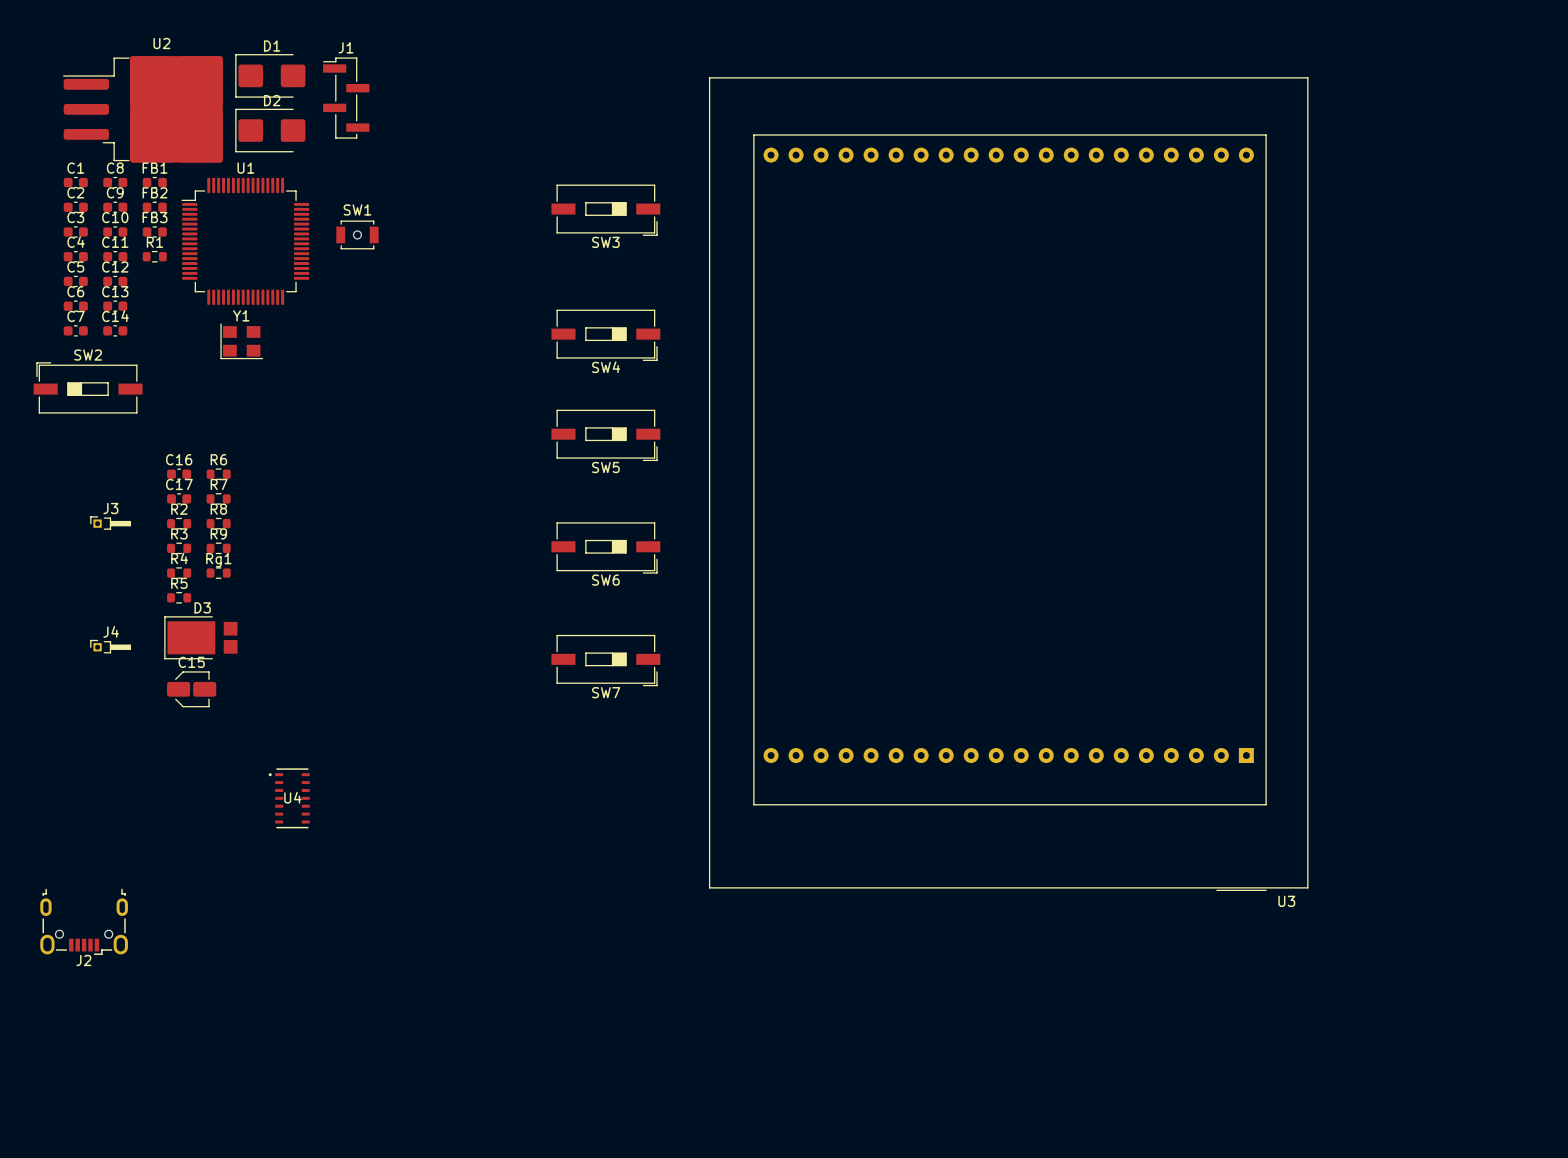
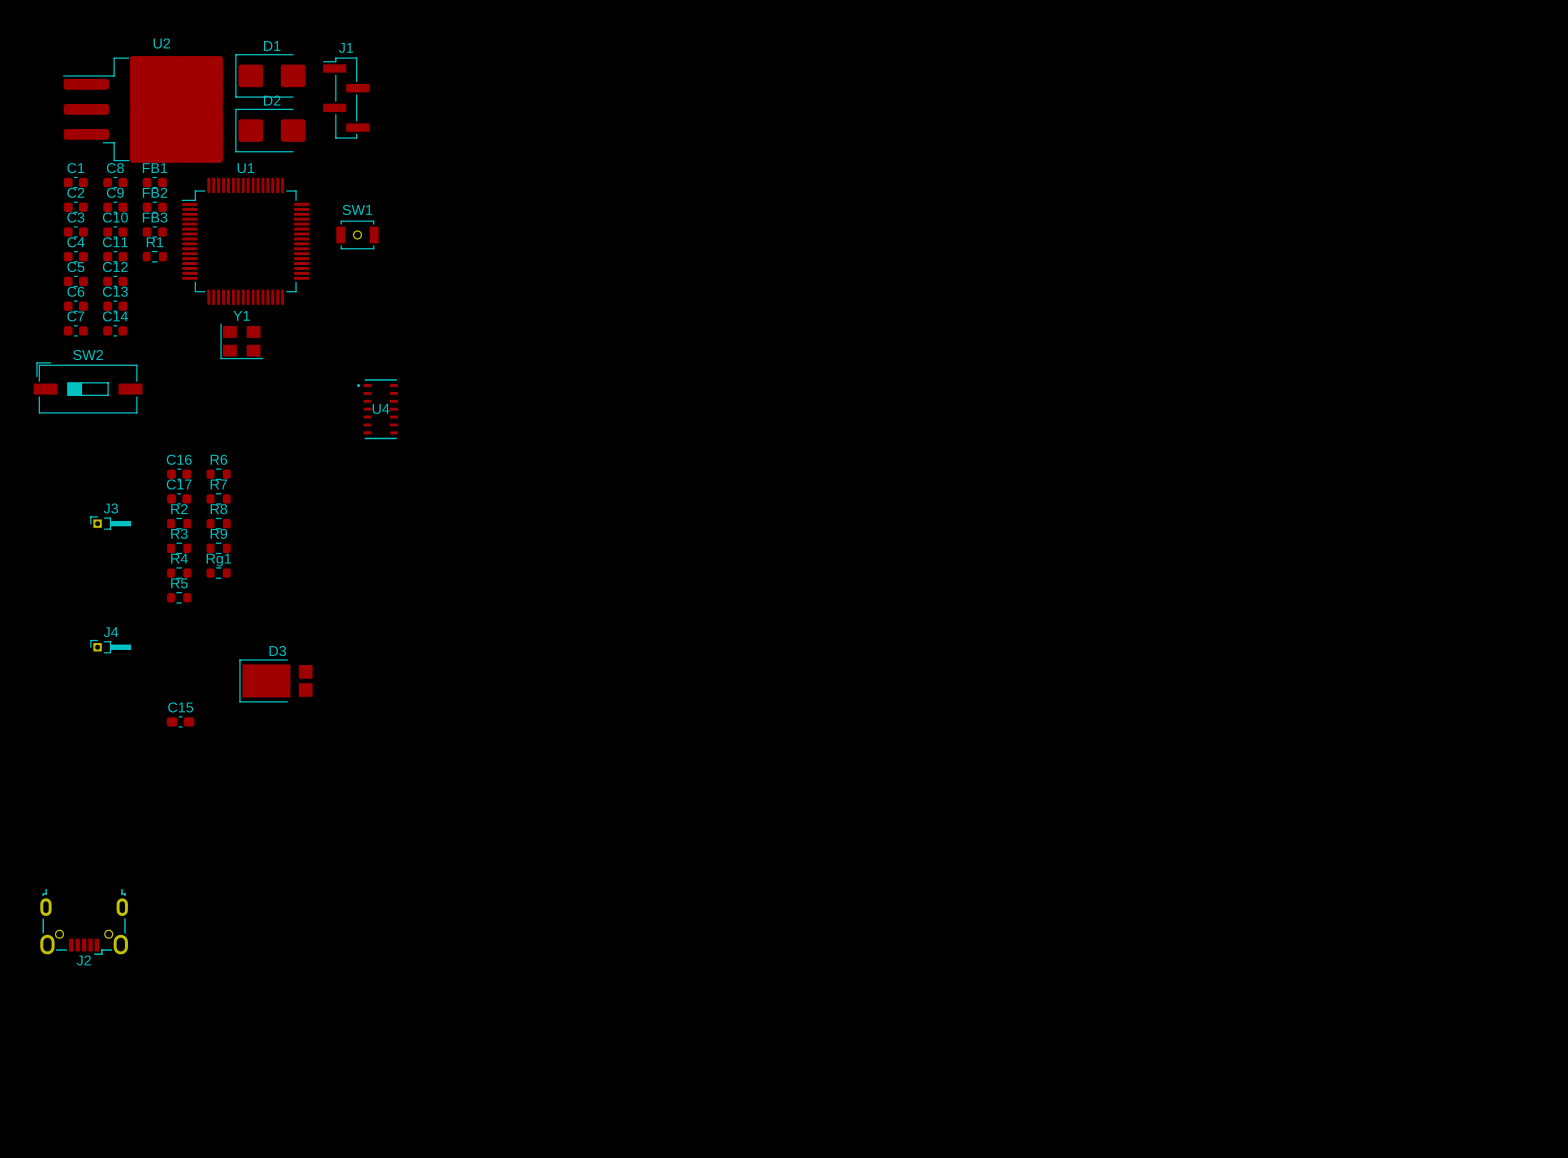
SW3: (605, 210) -> none
SW4: (605, 335) -> none
SW5: (605, 435) -> none
U3: (1008, 484) -> none
SW6: (605, 547) -> none
D3 position: (200, 637) -> (275, 680)
SW7: (605, 660) -> none
C15 footprint: [167, 671, 217, 708] -> [166, 716, 195, 728]
U4 position: (289, 798) -> (377, 409)

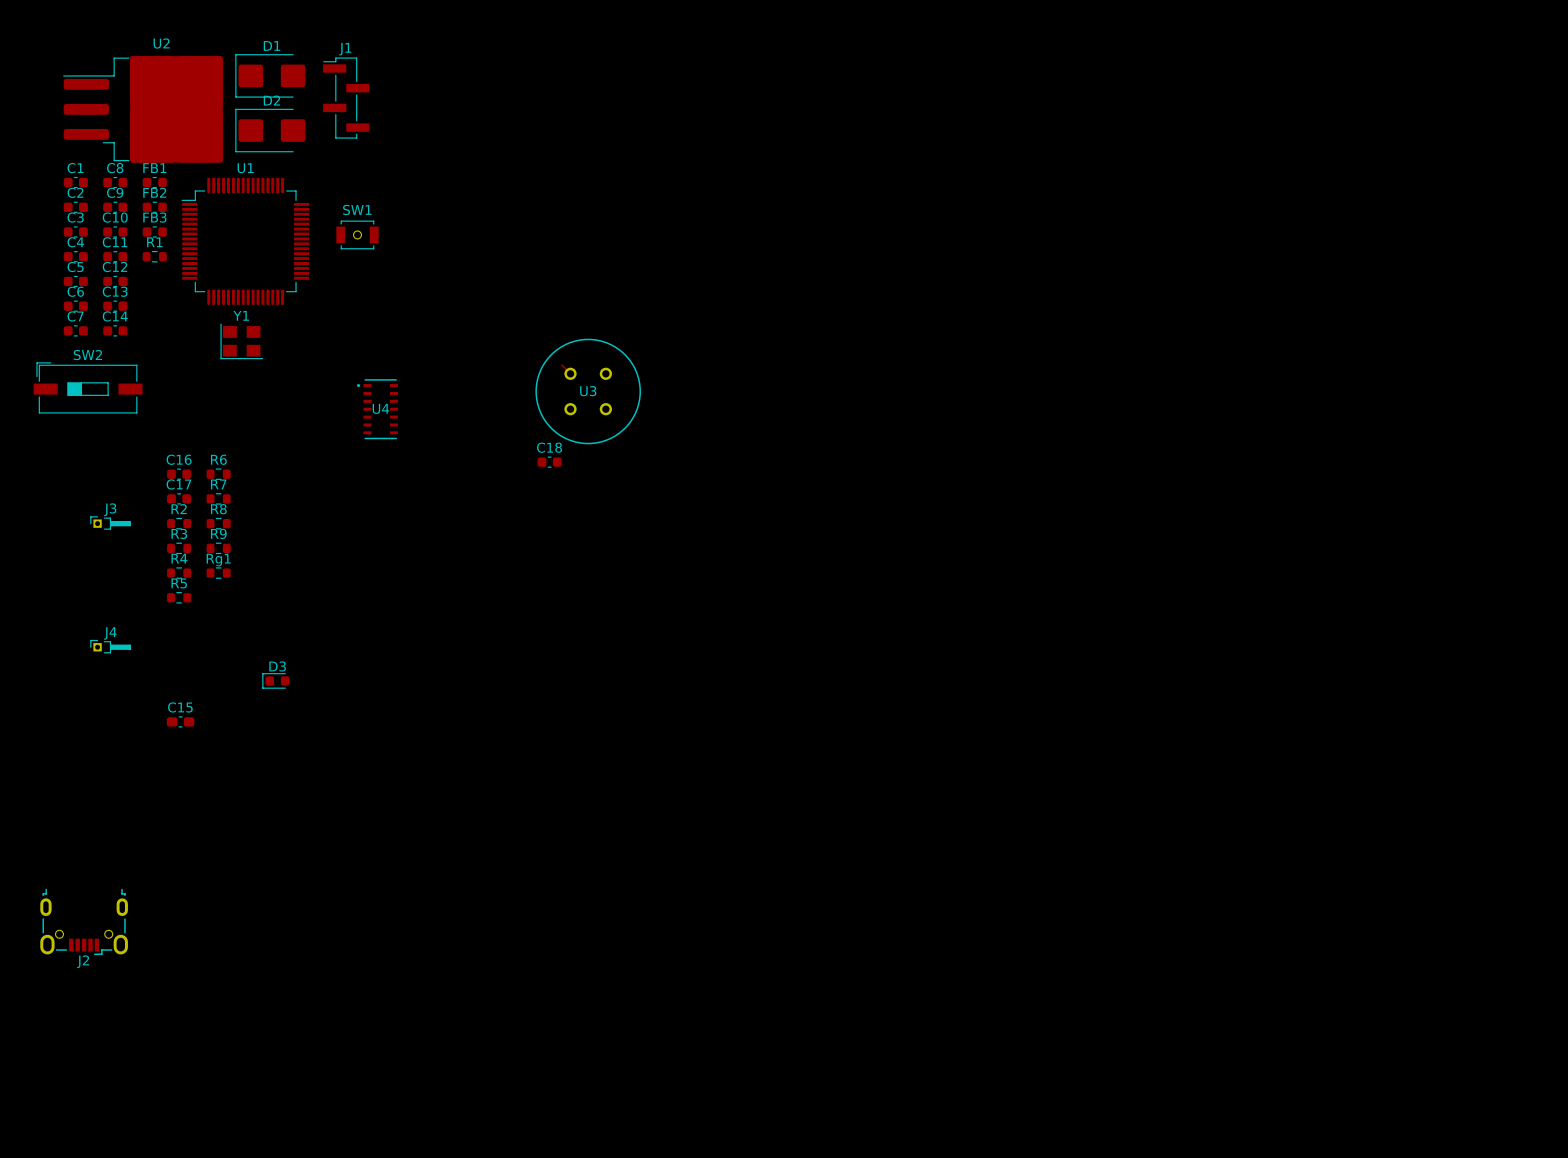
U3: none -> (588, 391)
C18: none -> (549, 462)
D3 footprint: [239, 659, 313, 703] -> [262, 673, 290, 689]

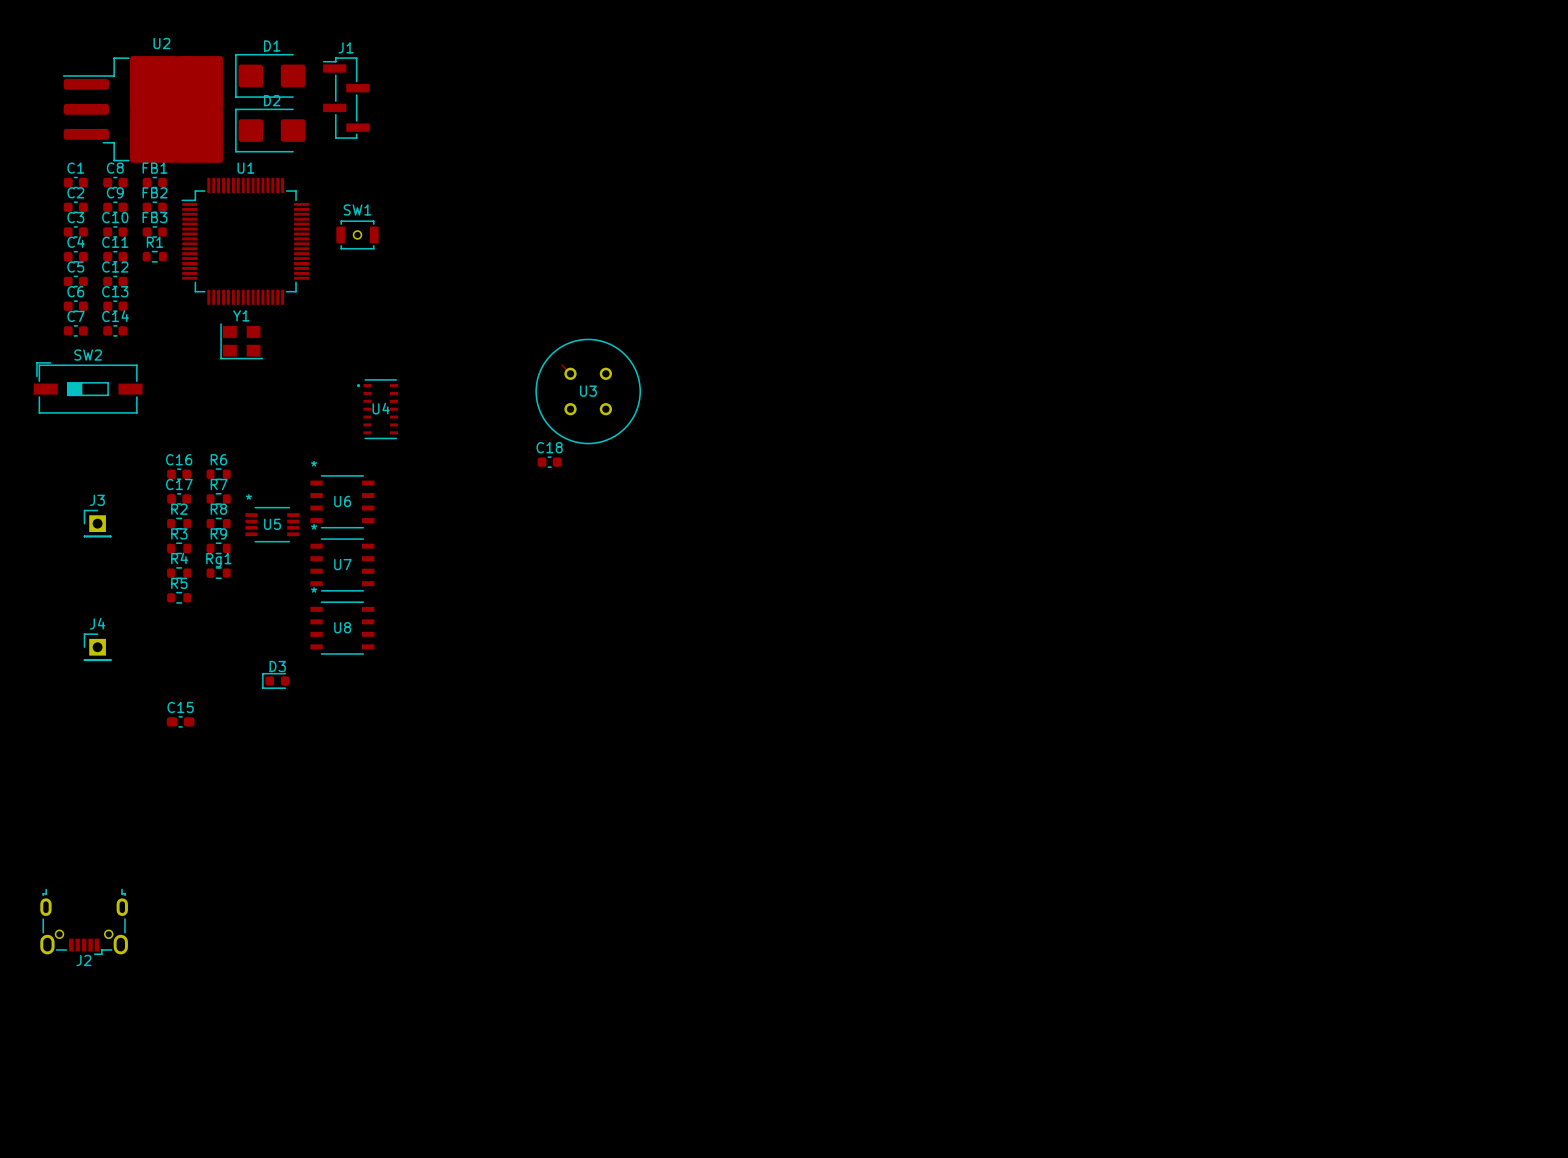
U6: none -> (342, 501)
J3 footprint: [90, 516, 131, 530] -> [83, 509, 112, 538]
U5: none -> (272, 524)
U7: none -> (342, 564)
U8: none -> (342, 628)
J4 footprint: [90, 639, 131, 654] -> [83, 633, 112, 661]

